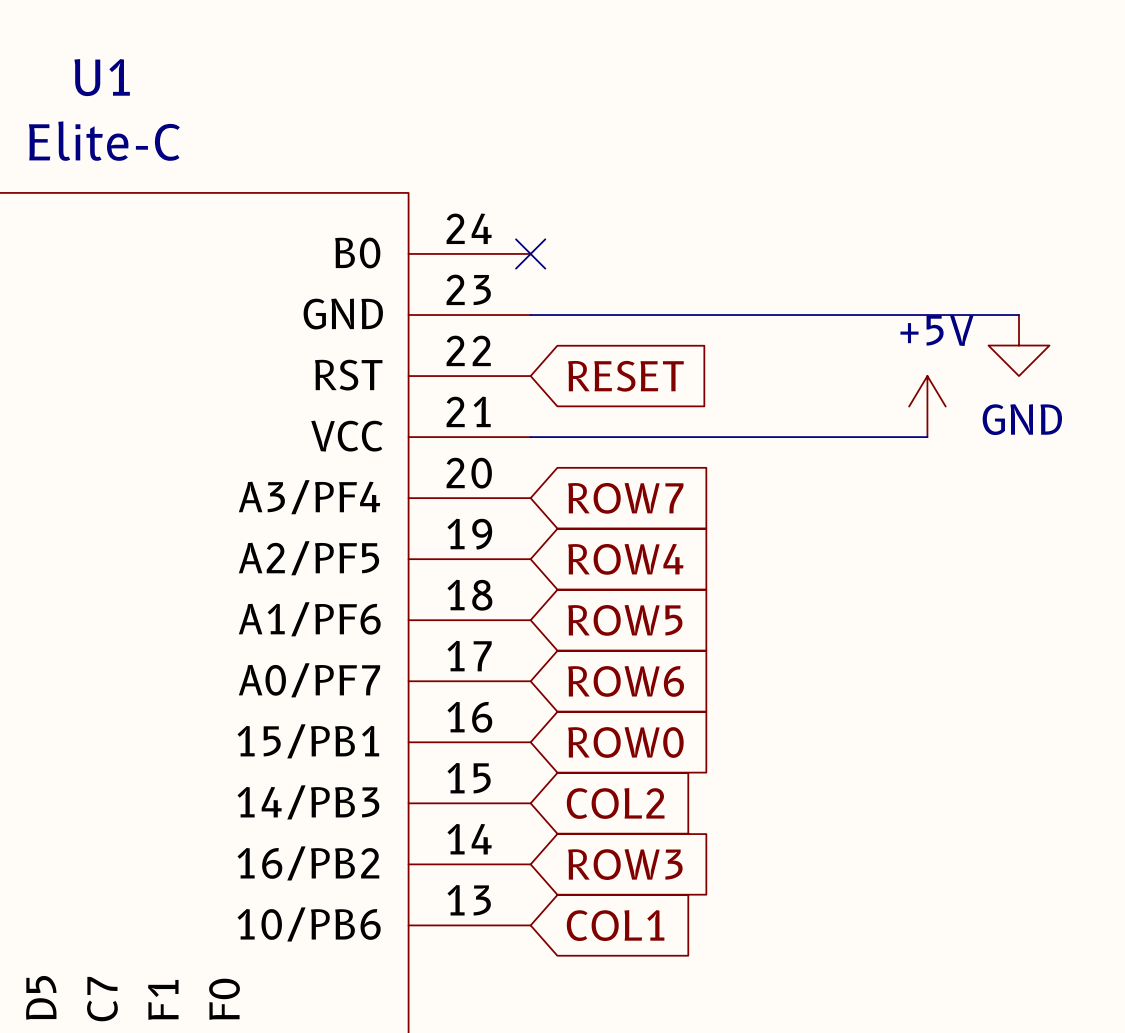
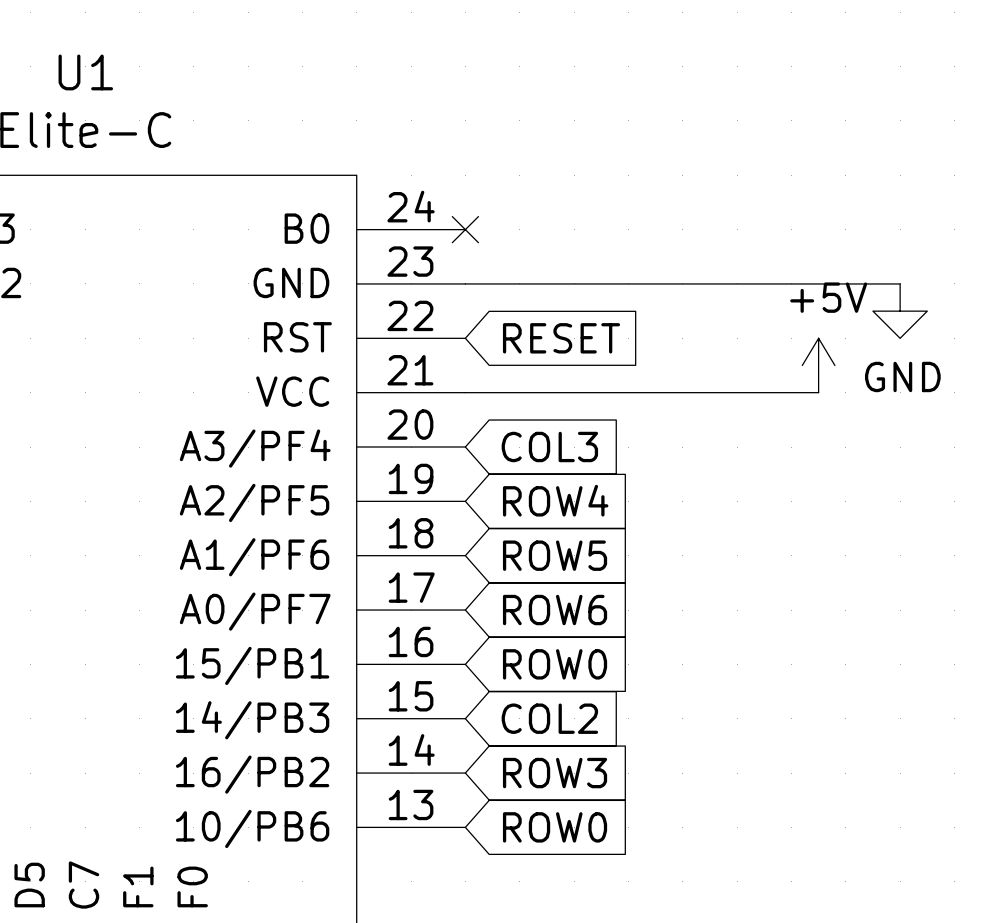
global label: ROW7 (625, 498) -> COL3 (549, 447)
global label: COL1 (615, 925) -> ROW0 (555, 827)

